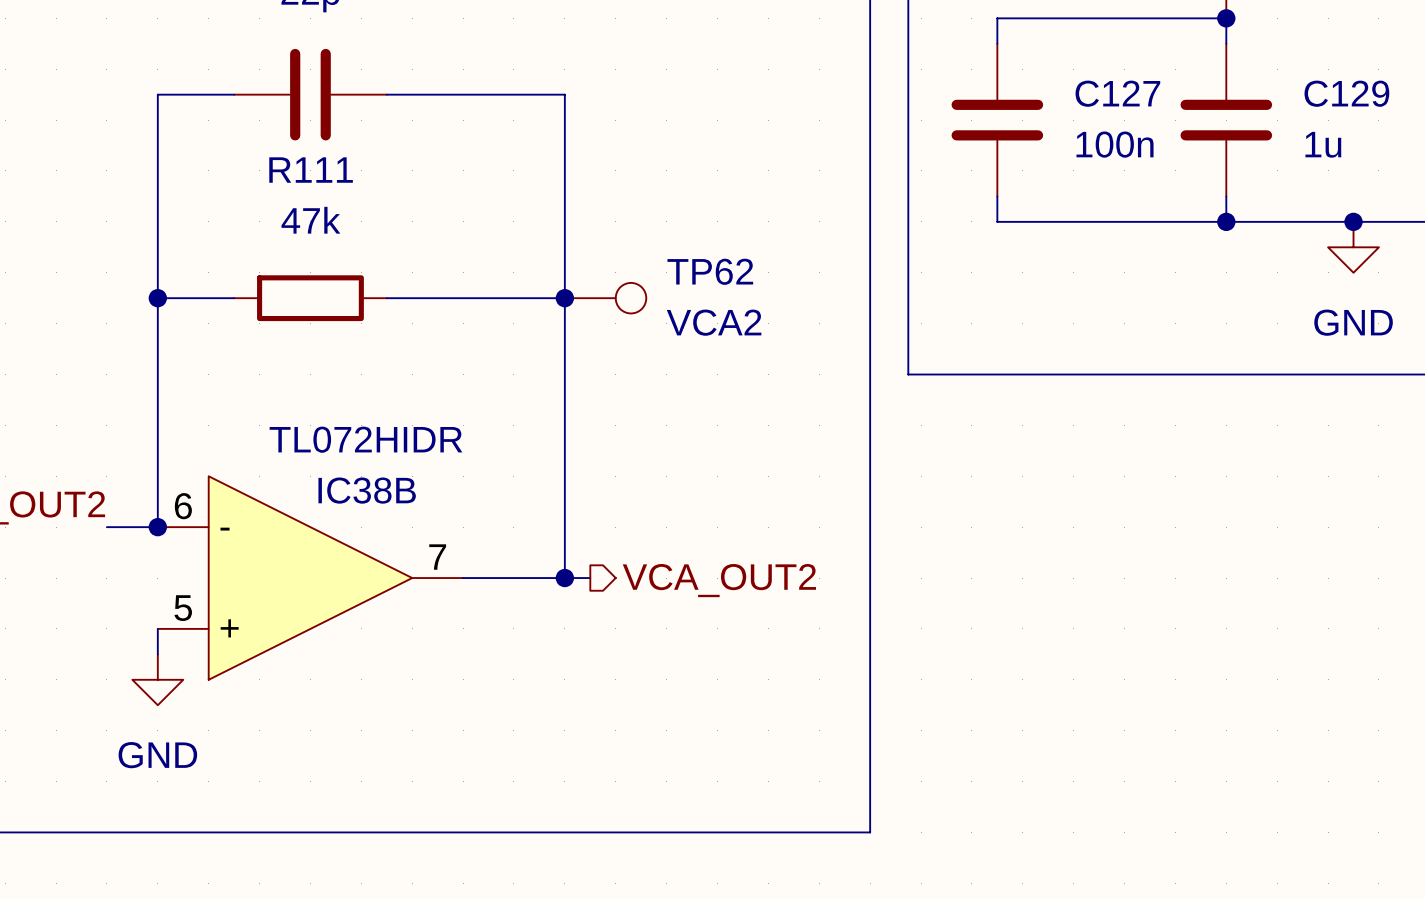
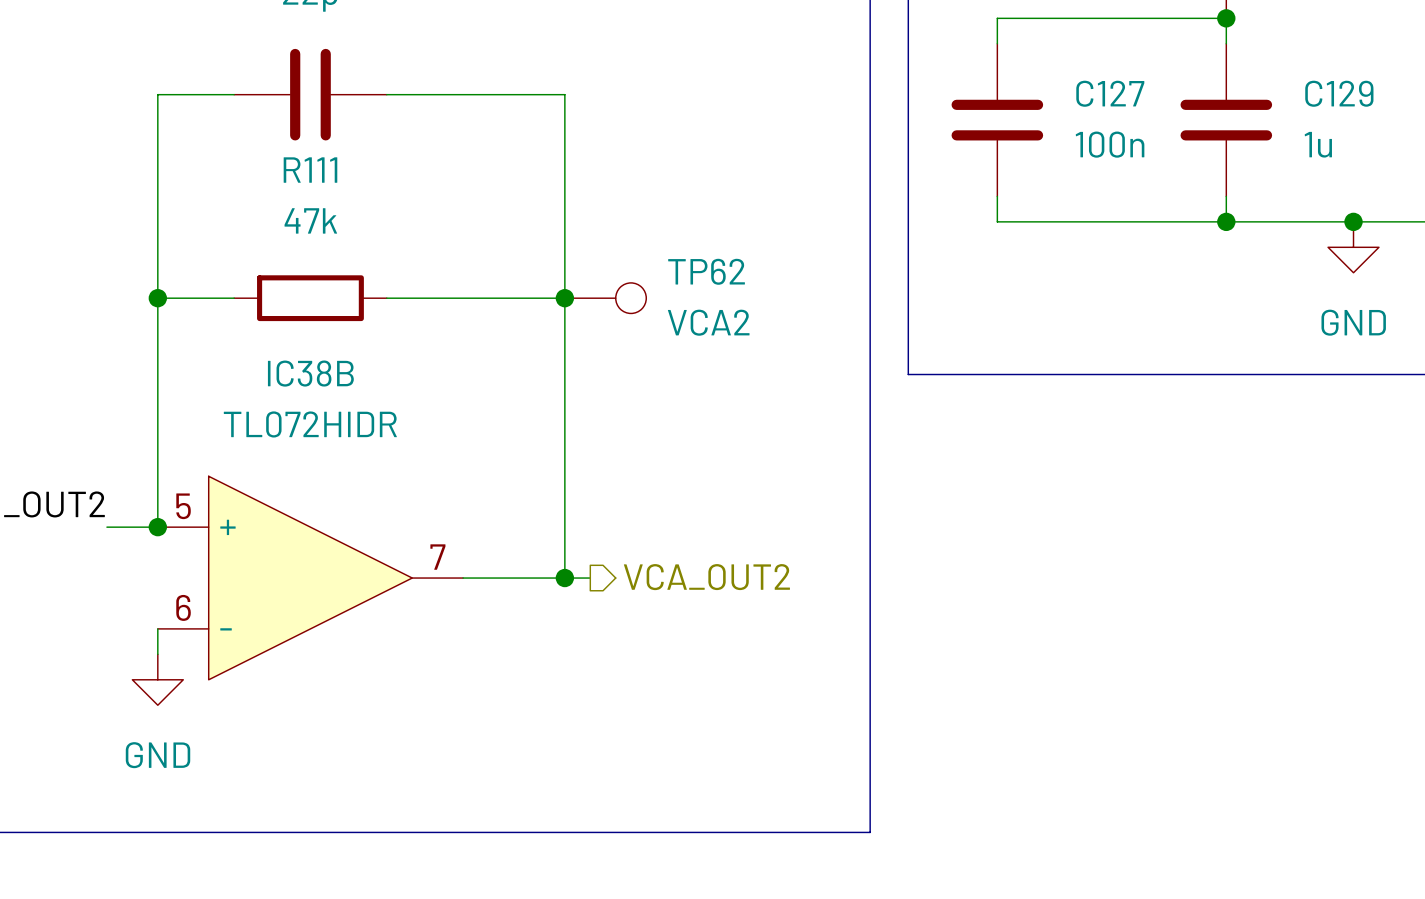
IC38B value position: TL072HIDR (365, 439) -> TL072HIDR (310, 424)
IC38B name position: IC38B (367, 490) -> IC38B (310, 373)
IC38B flip: as is (310, 578) -> up-down (310, 578)

